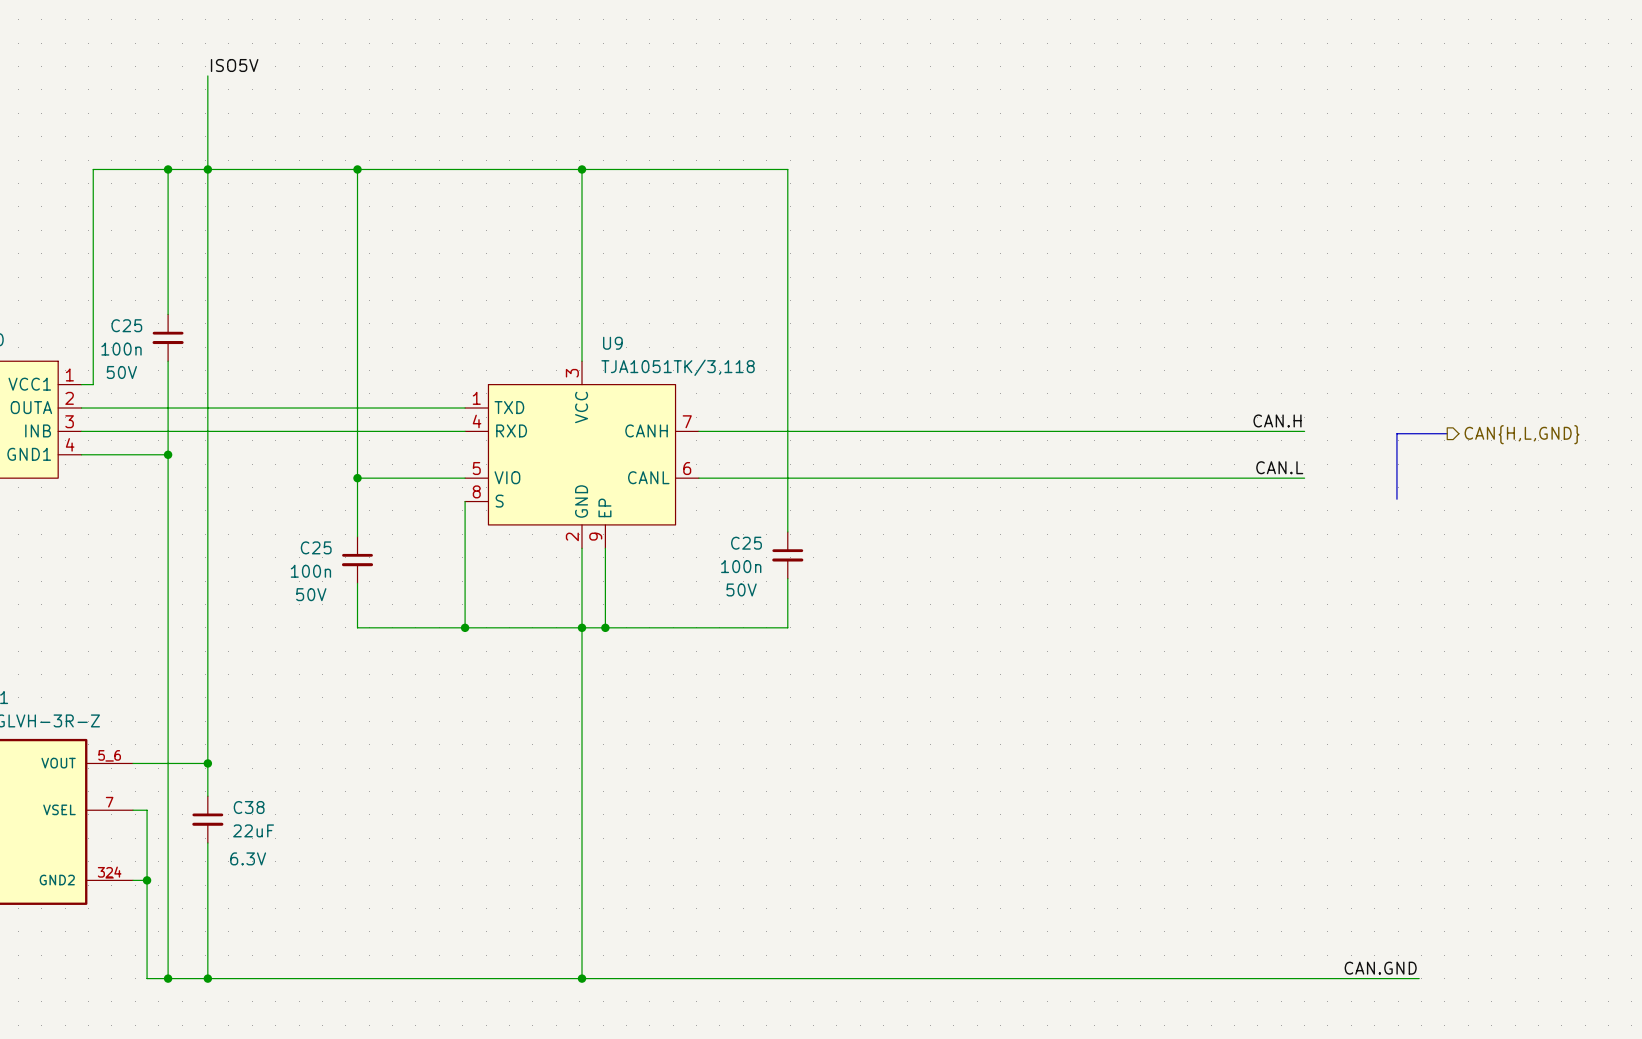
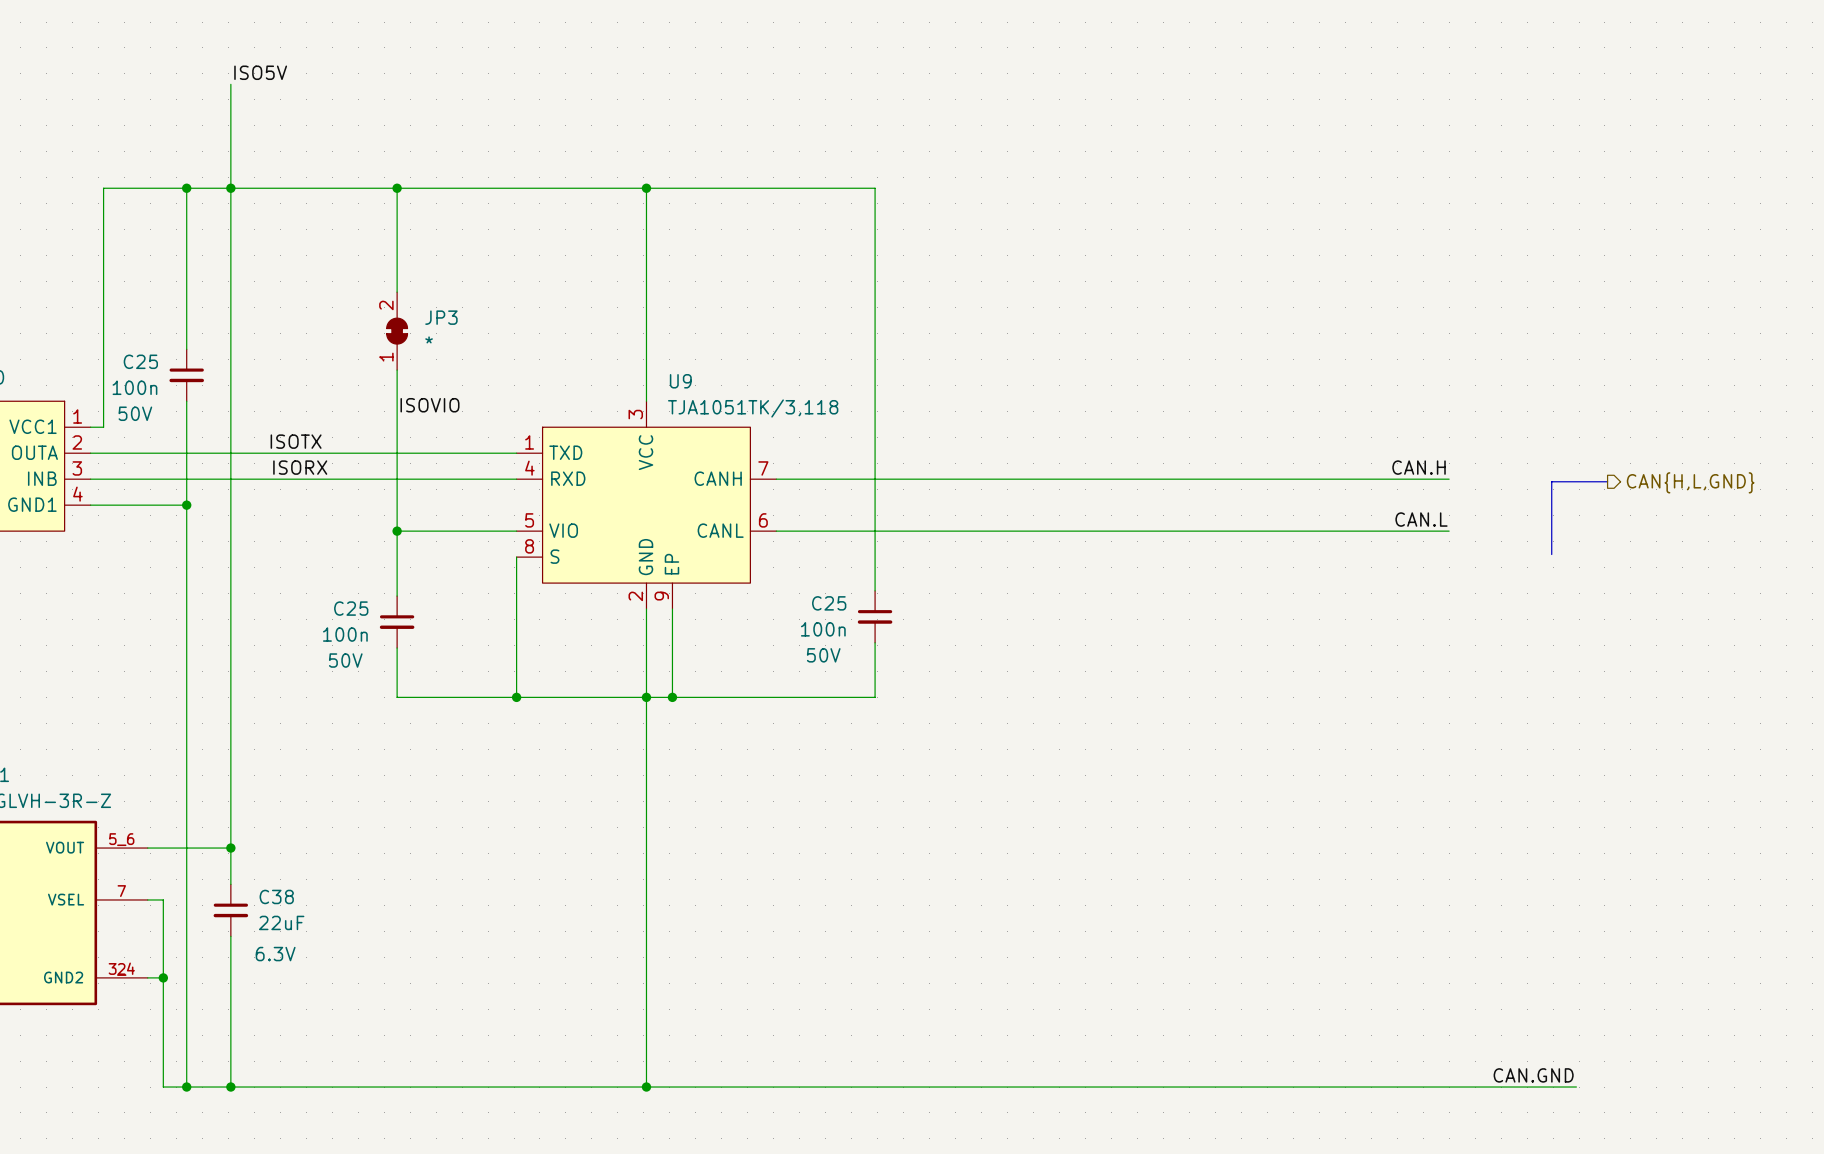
JP3: none -> * (397, 331)
label: none -> ISOVIO (429, 405)
label: none -> ISOTX (296, 441)
label: none -> ISORX (300, 467)

